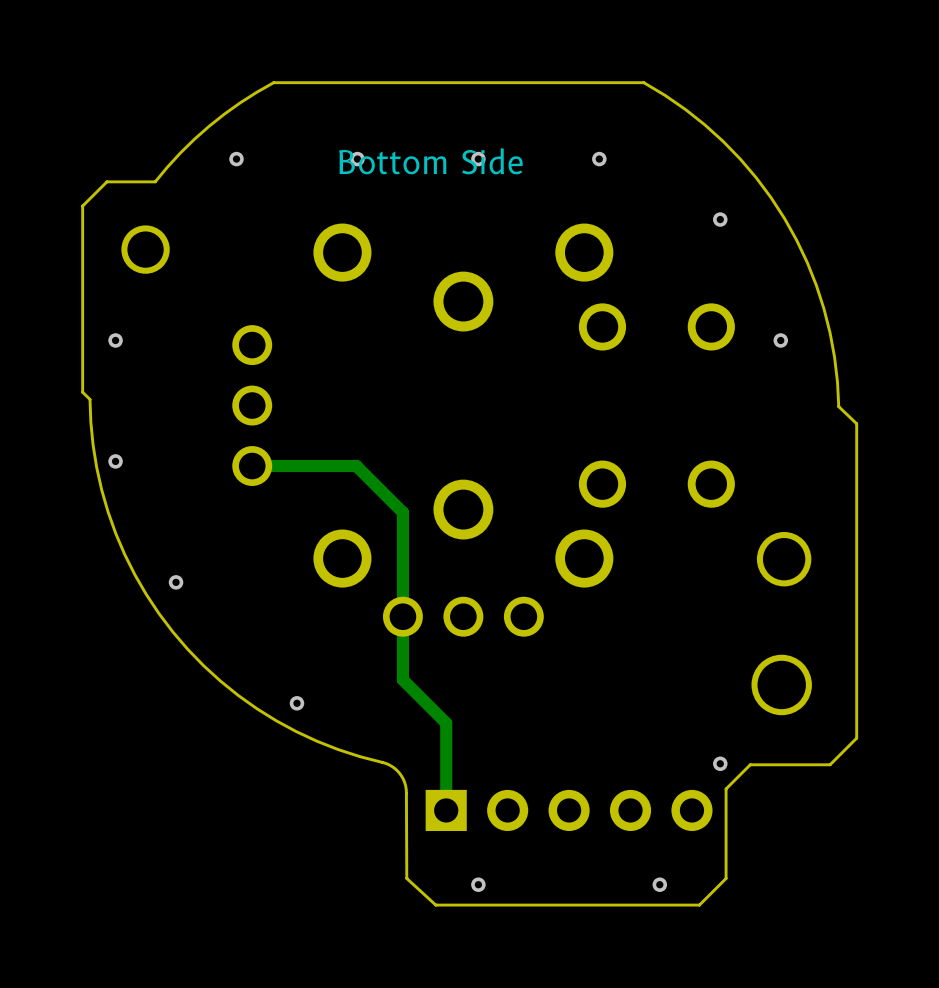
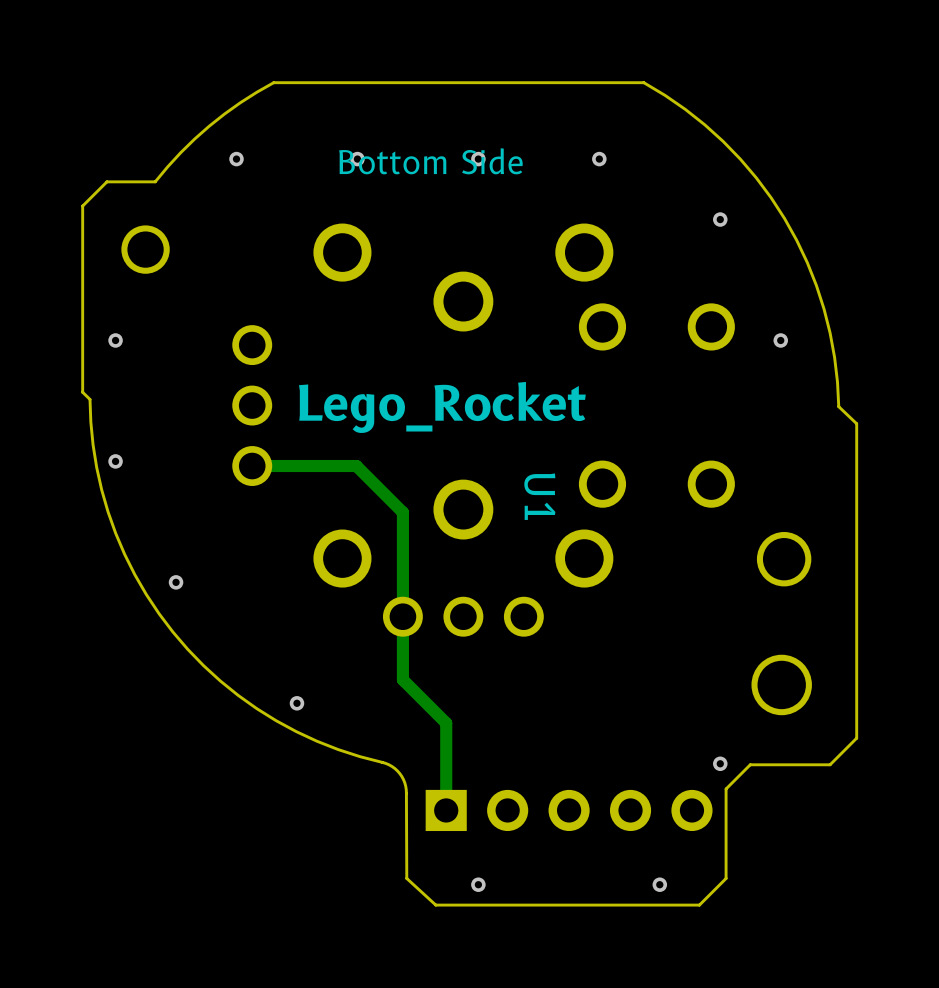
text: none -> Lego_Rocket (442, 407)
text: none -> U1 (539, 496)

